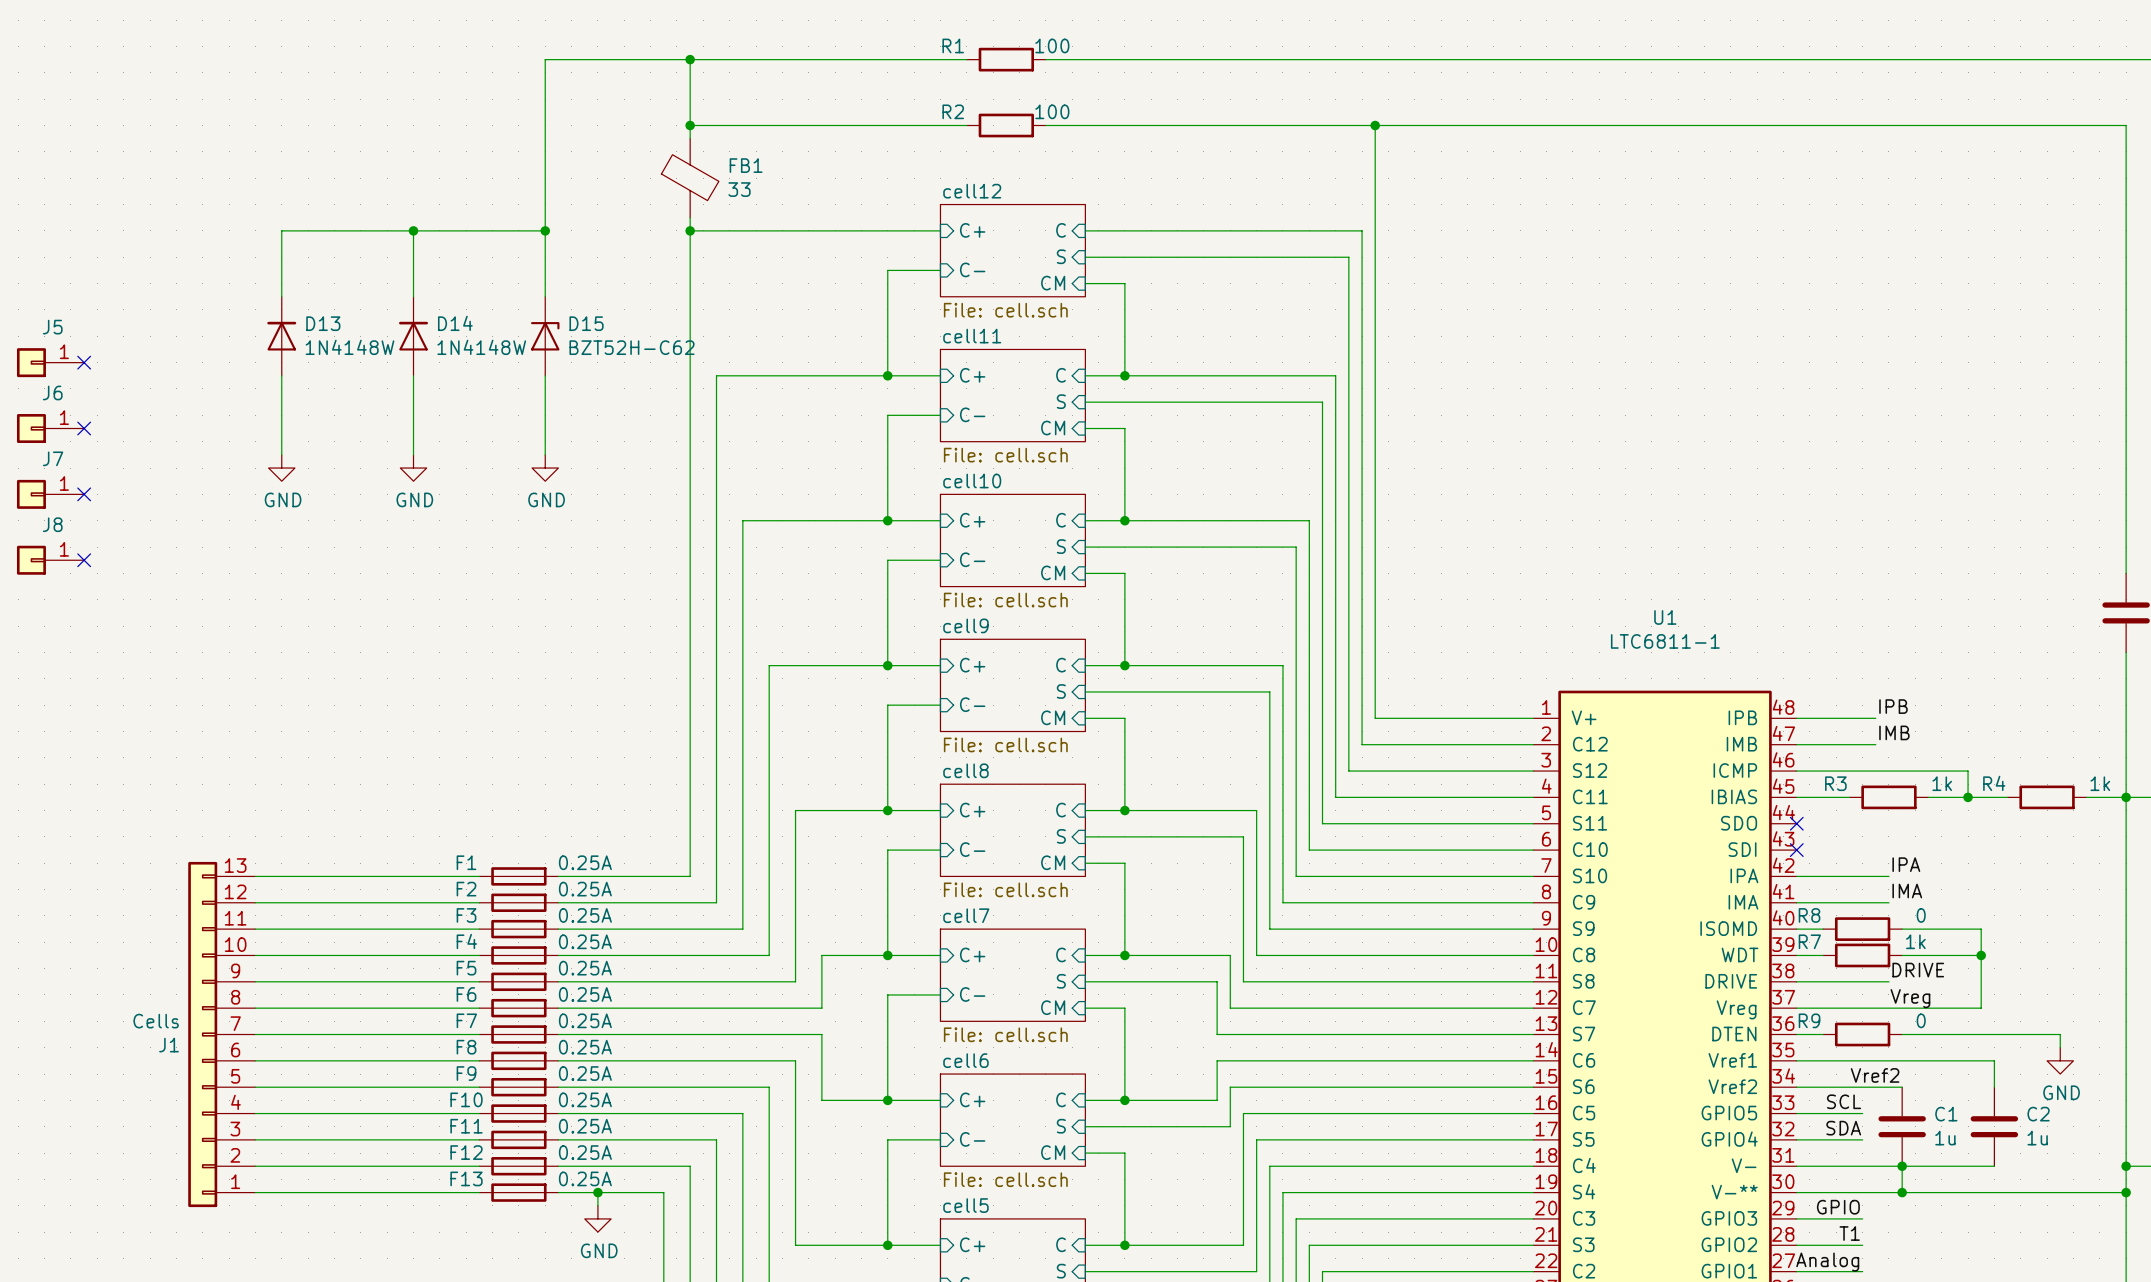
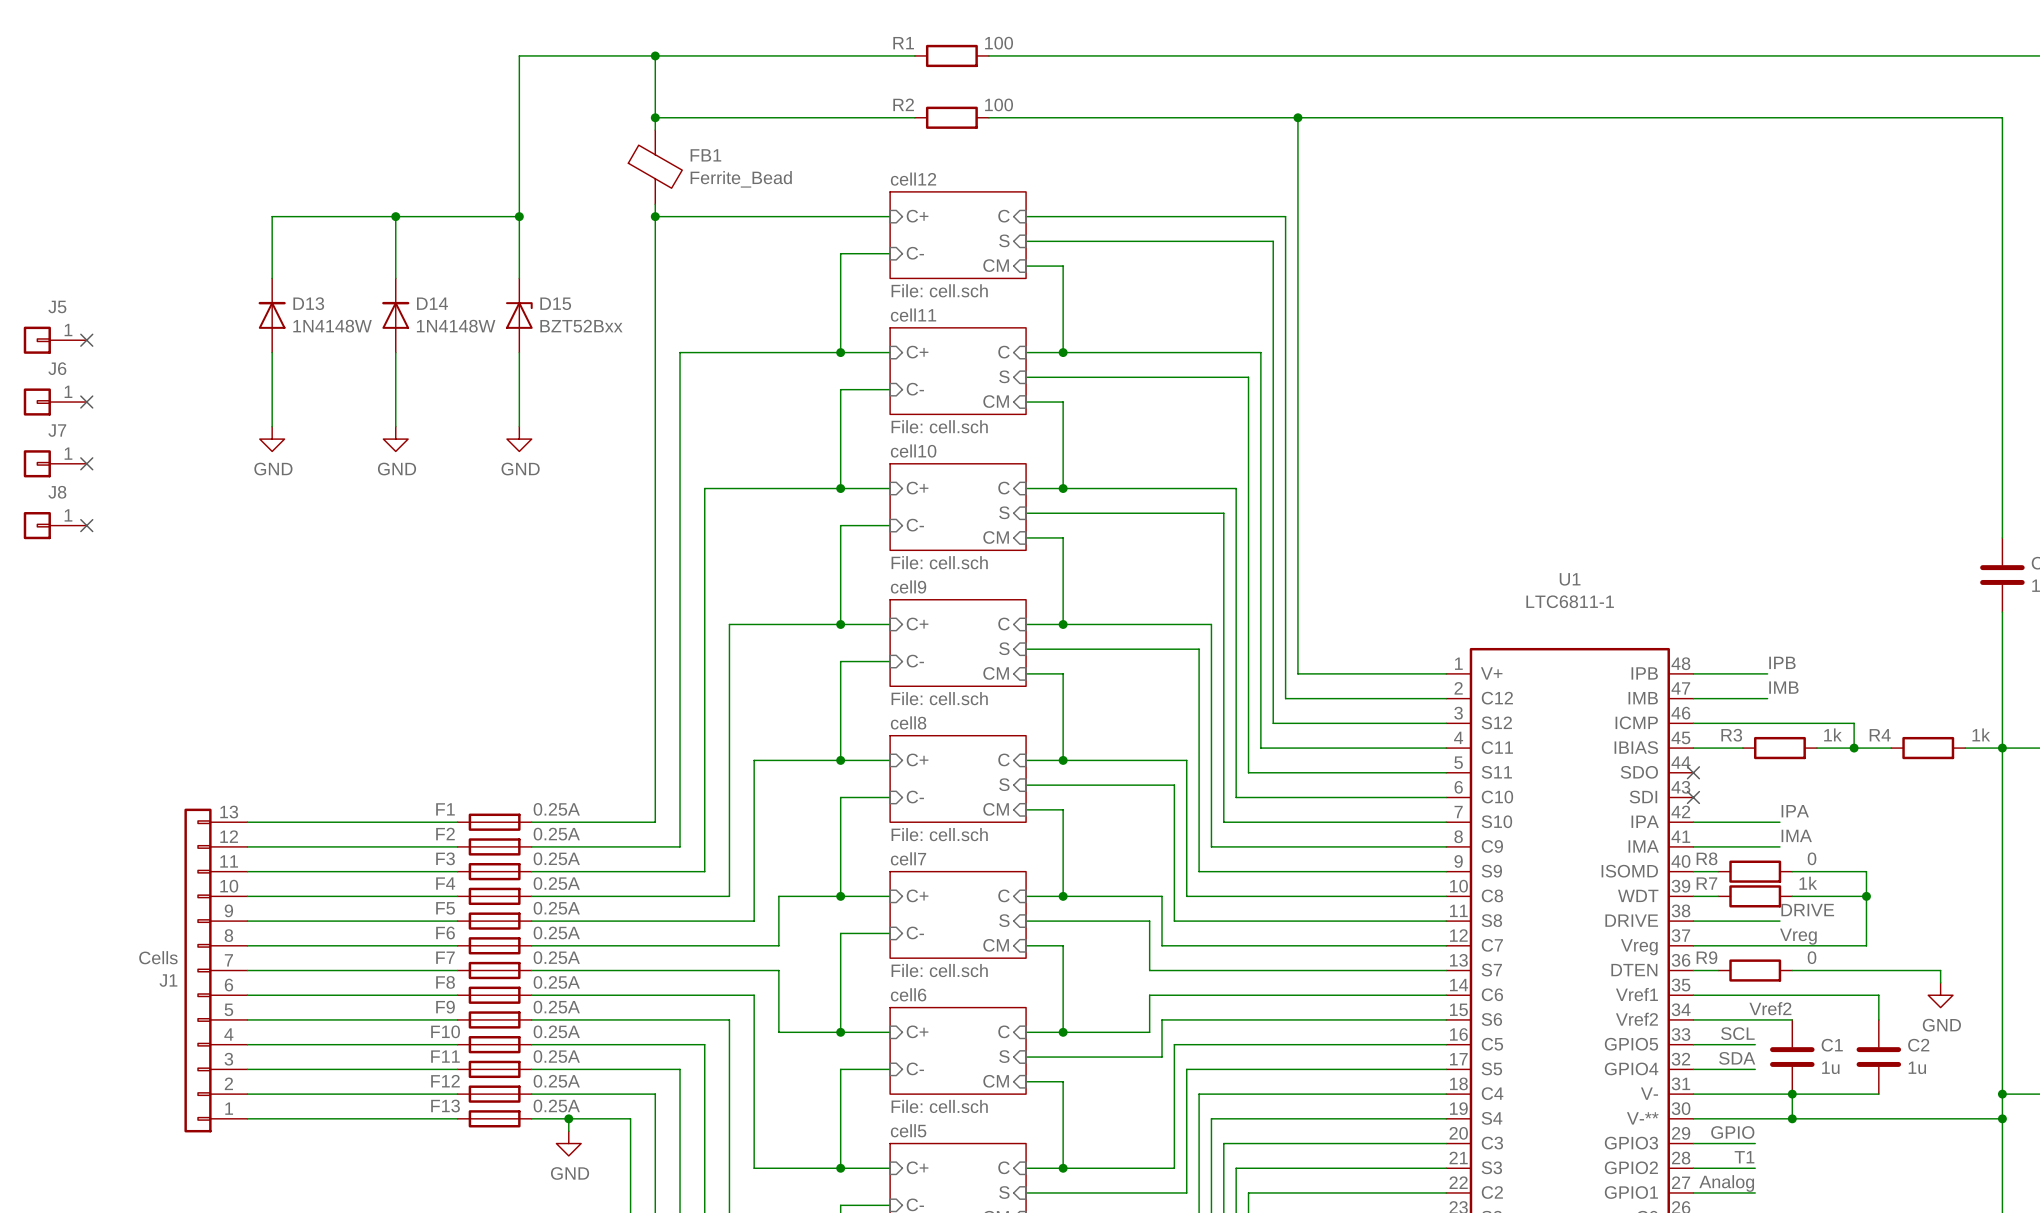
FB1 value: 33 (739, 189) -> Ferrite_Bead (741, 179)
D15 value: BZT52H-C62 (632, 347) -> BZT52Bxx (581, 326)

